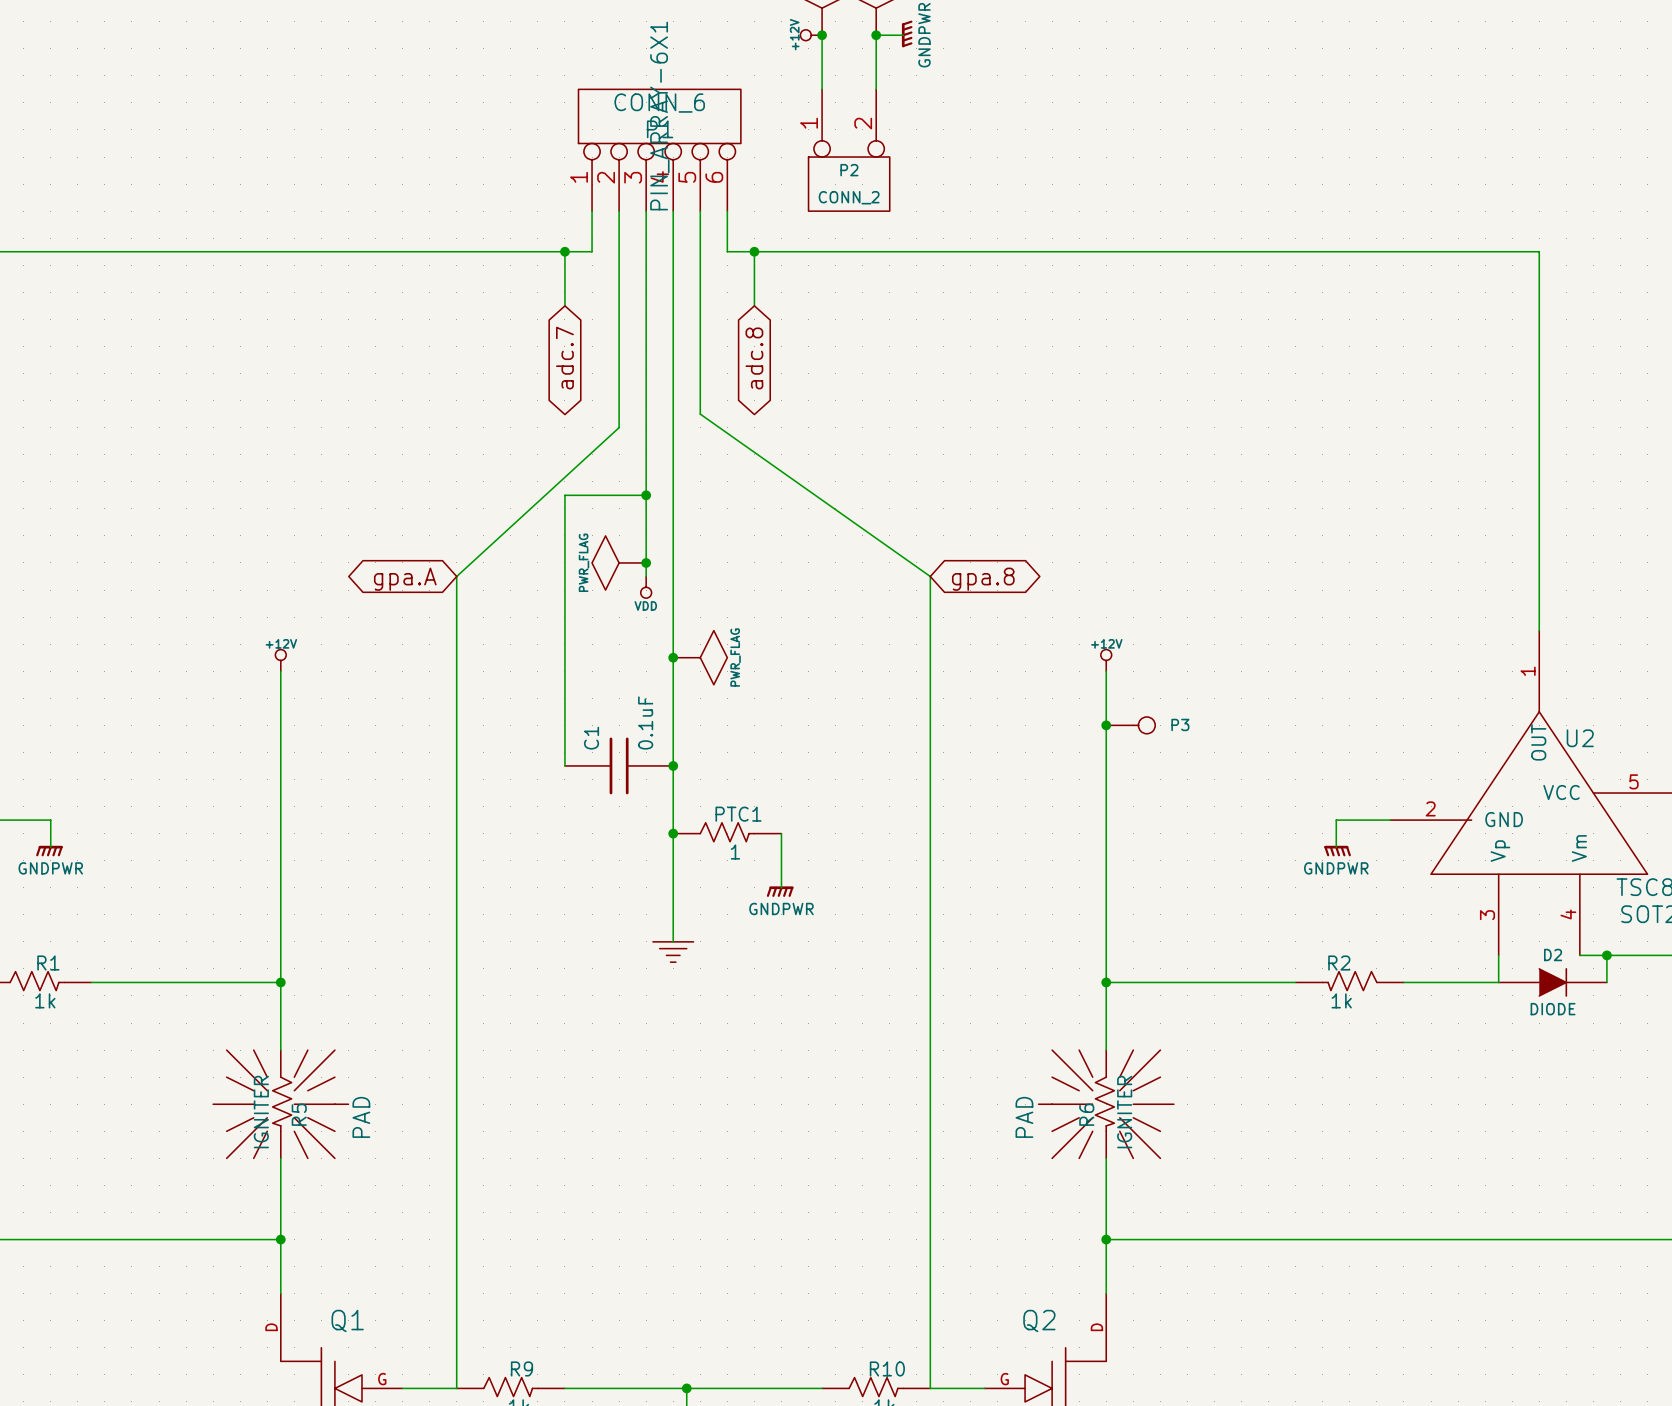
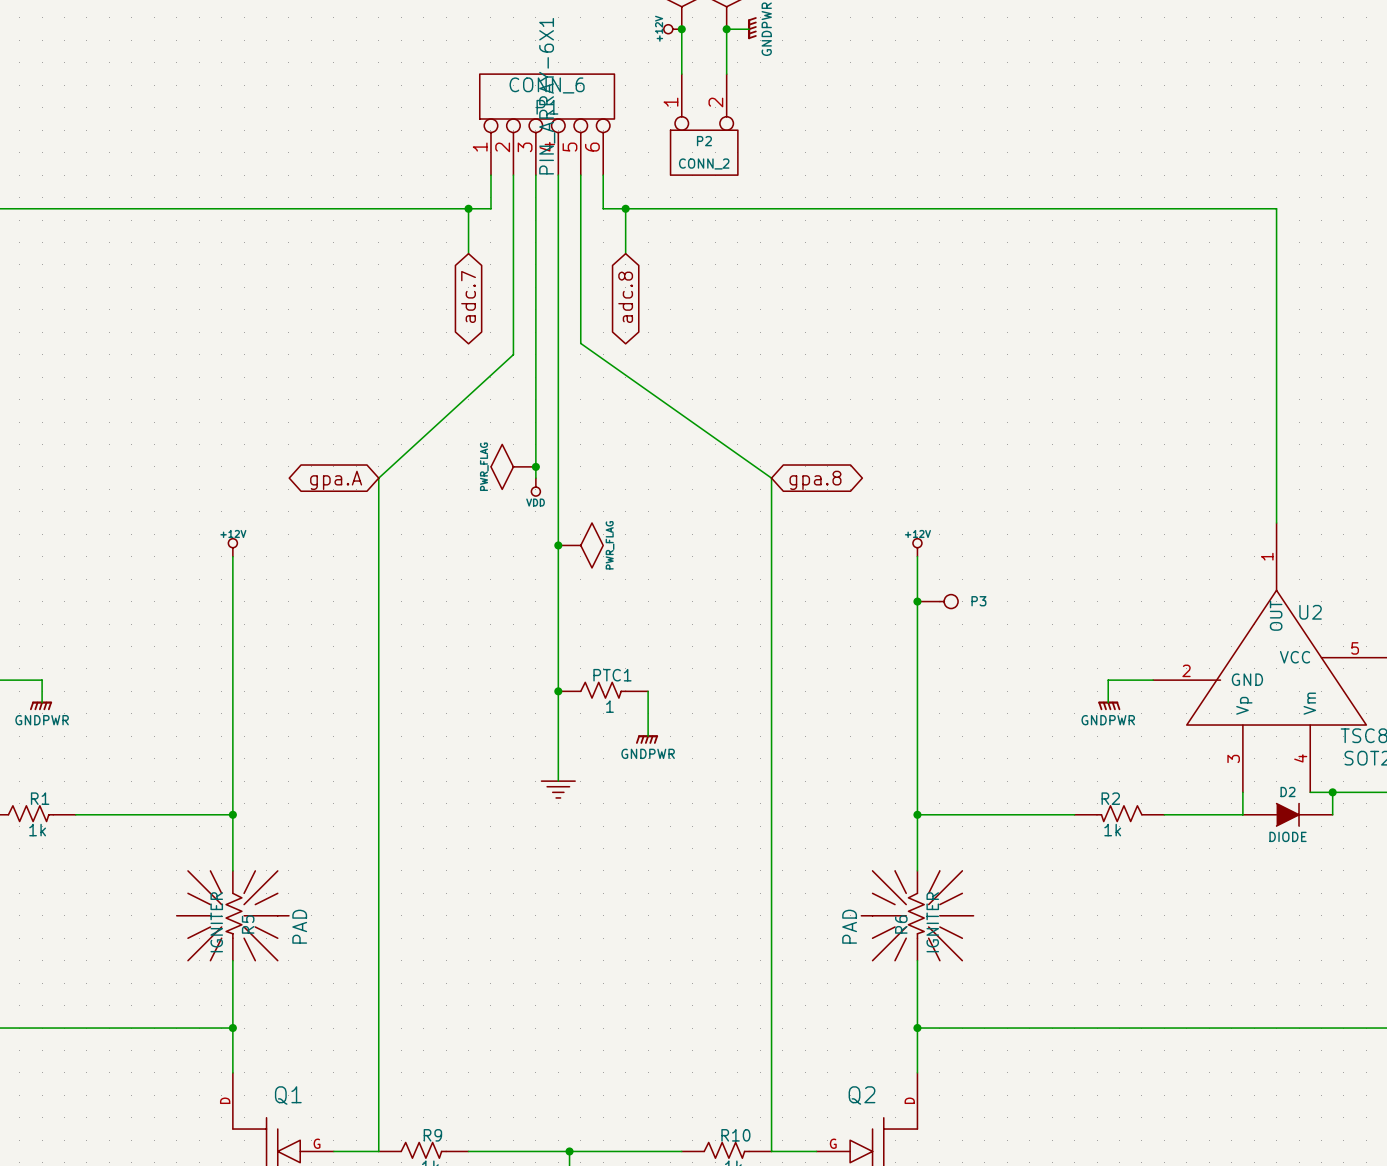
wire: (646, 495) (564, 495) (564, 765) -> none
junction: (646, 495) -> none
C1: 0.1uF (619, 765) -> none
junction: (673, 765) -> none

